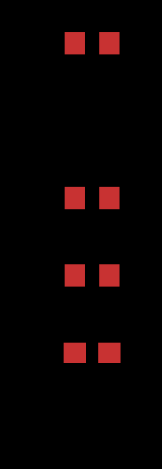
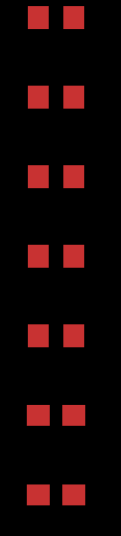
part: none -> (56, 176)
part: none -> (56, 494)

